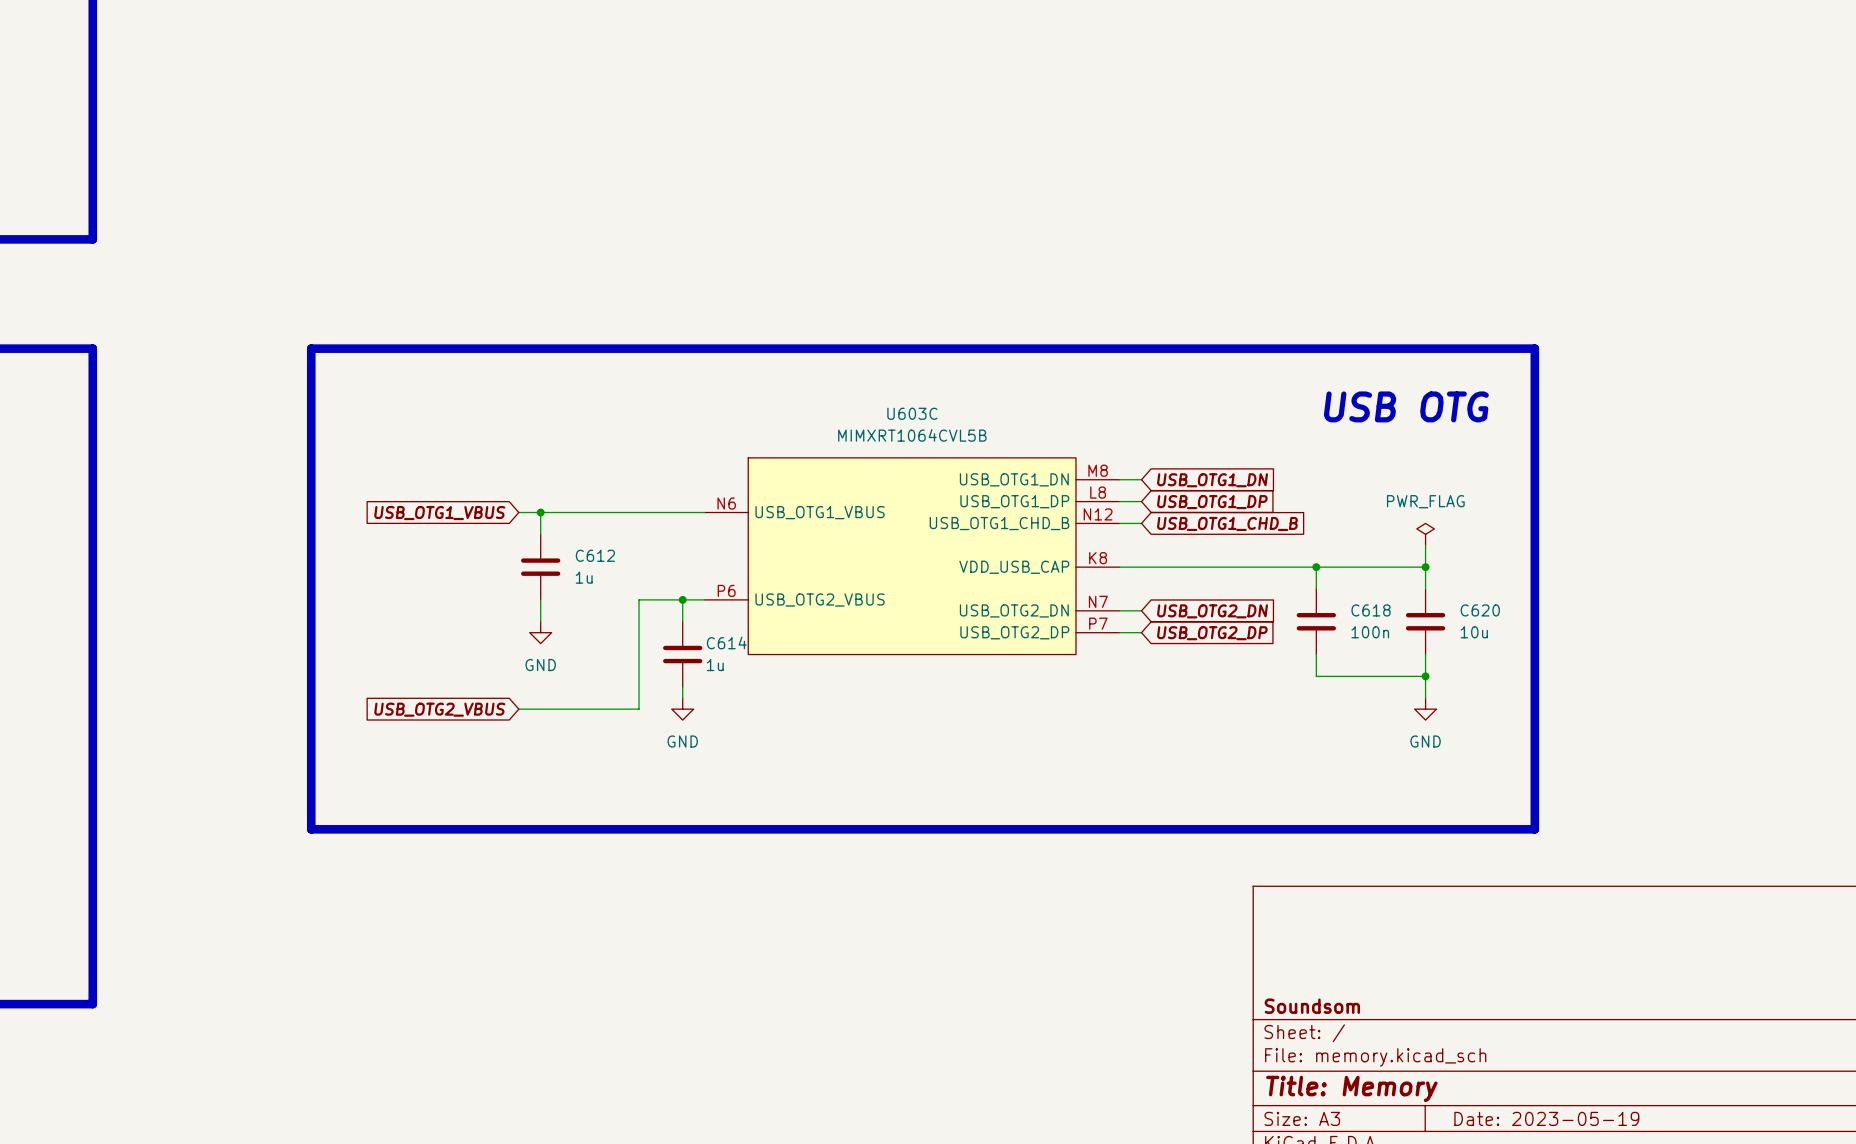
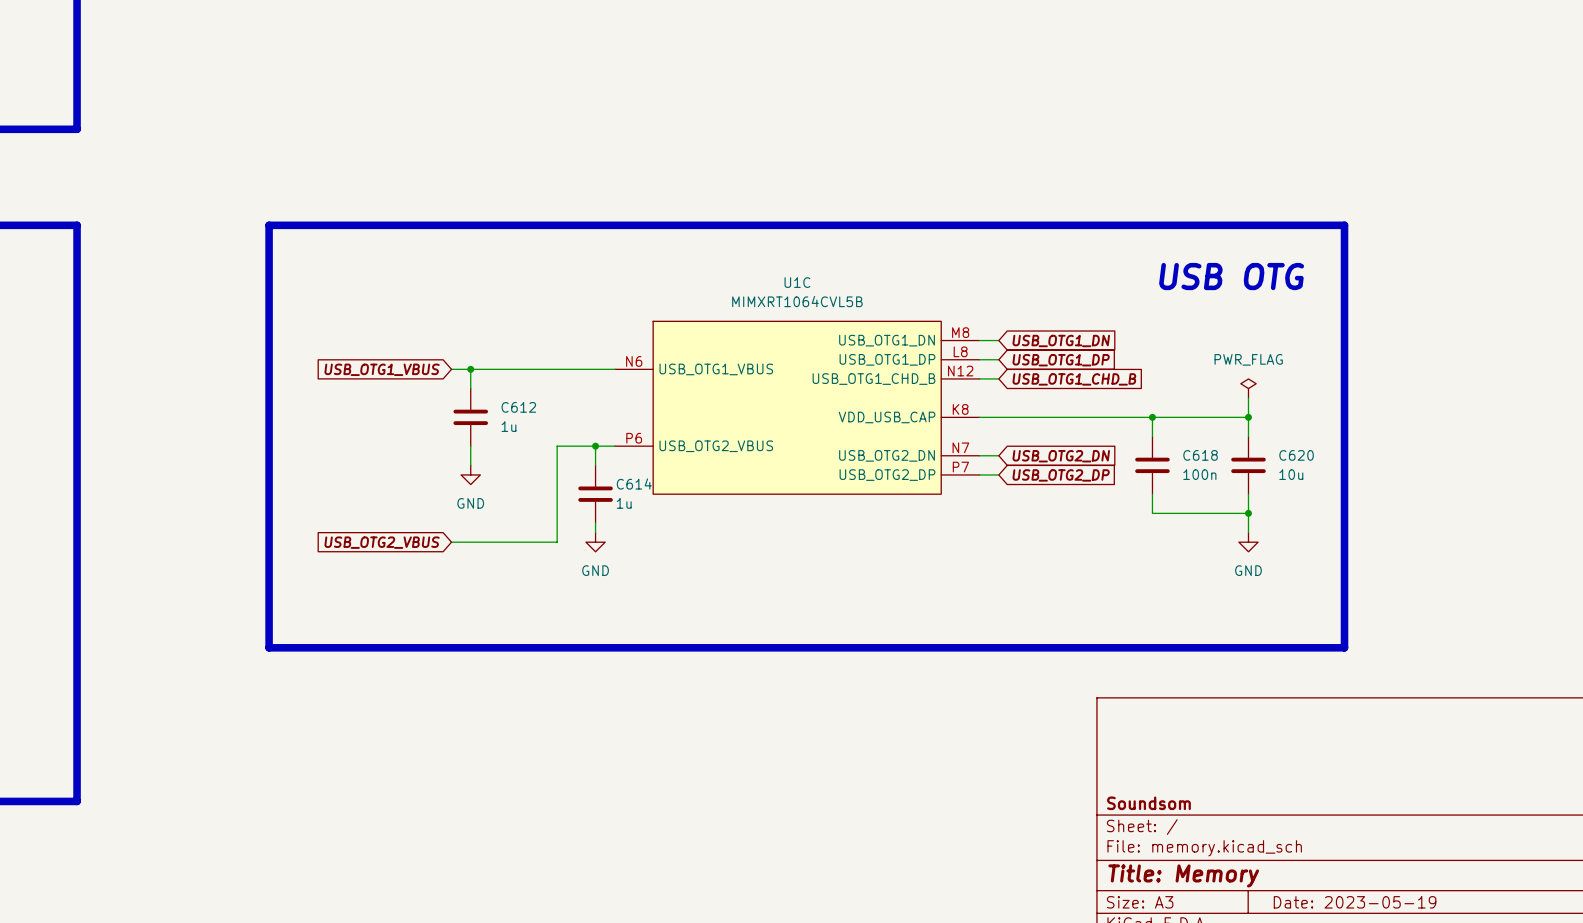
U603C name: U603C (912, 413) -> U1C (797, 282)

